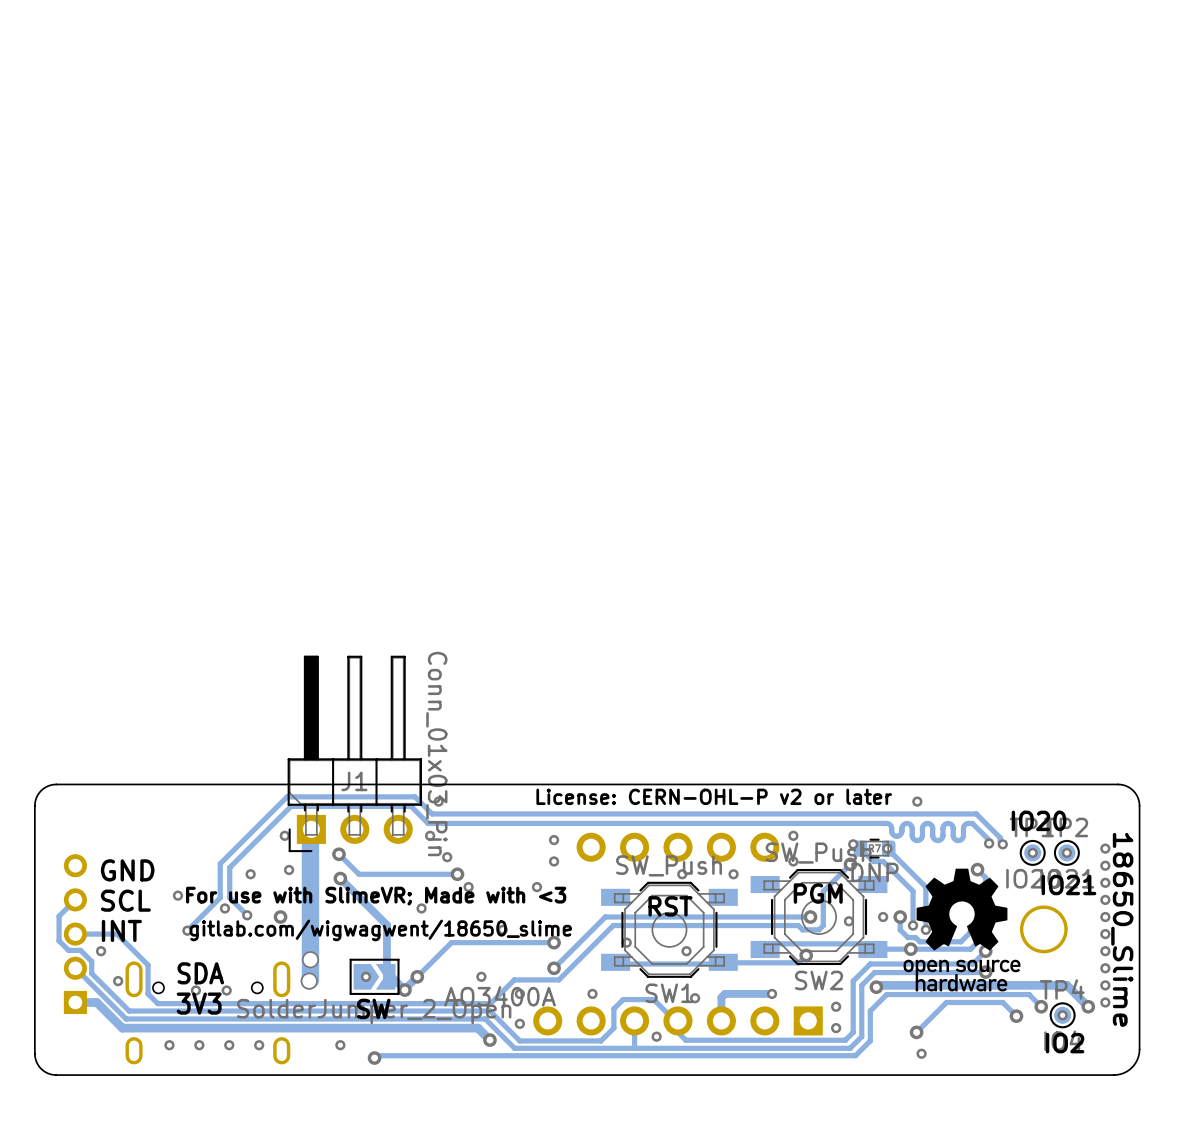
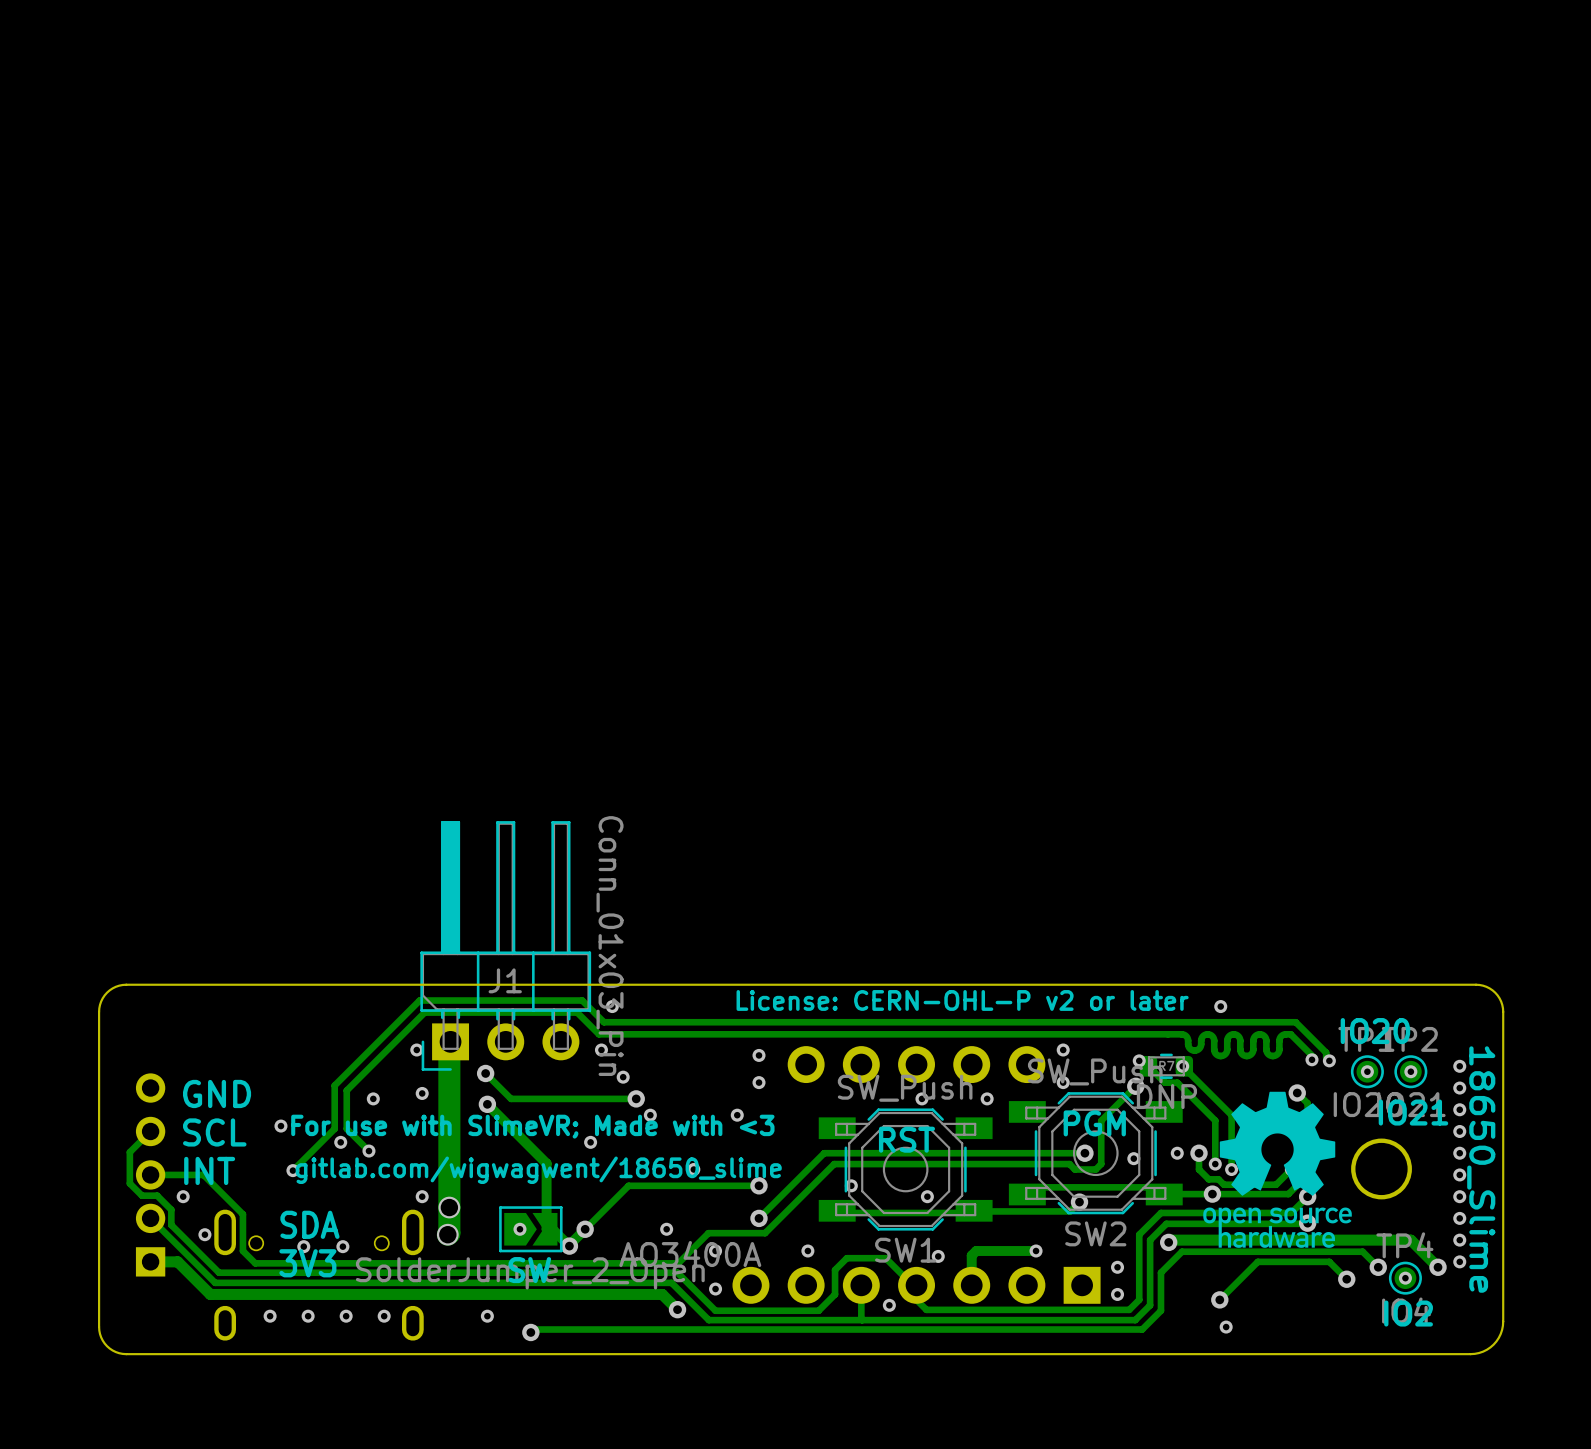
via: (280, 917) -> none
via: none -> (422, 1196)

